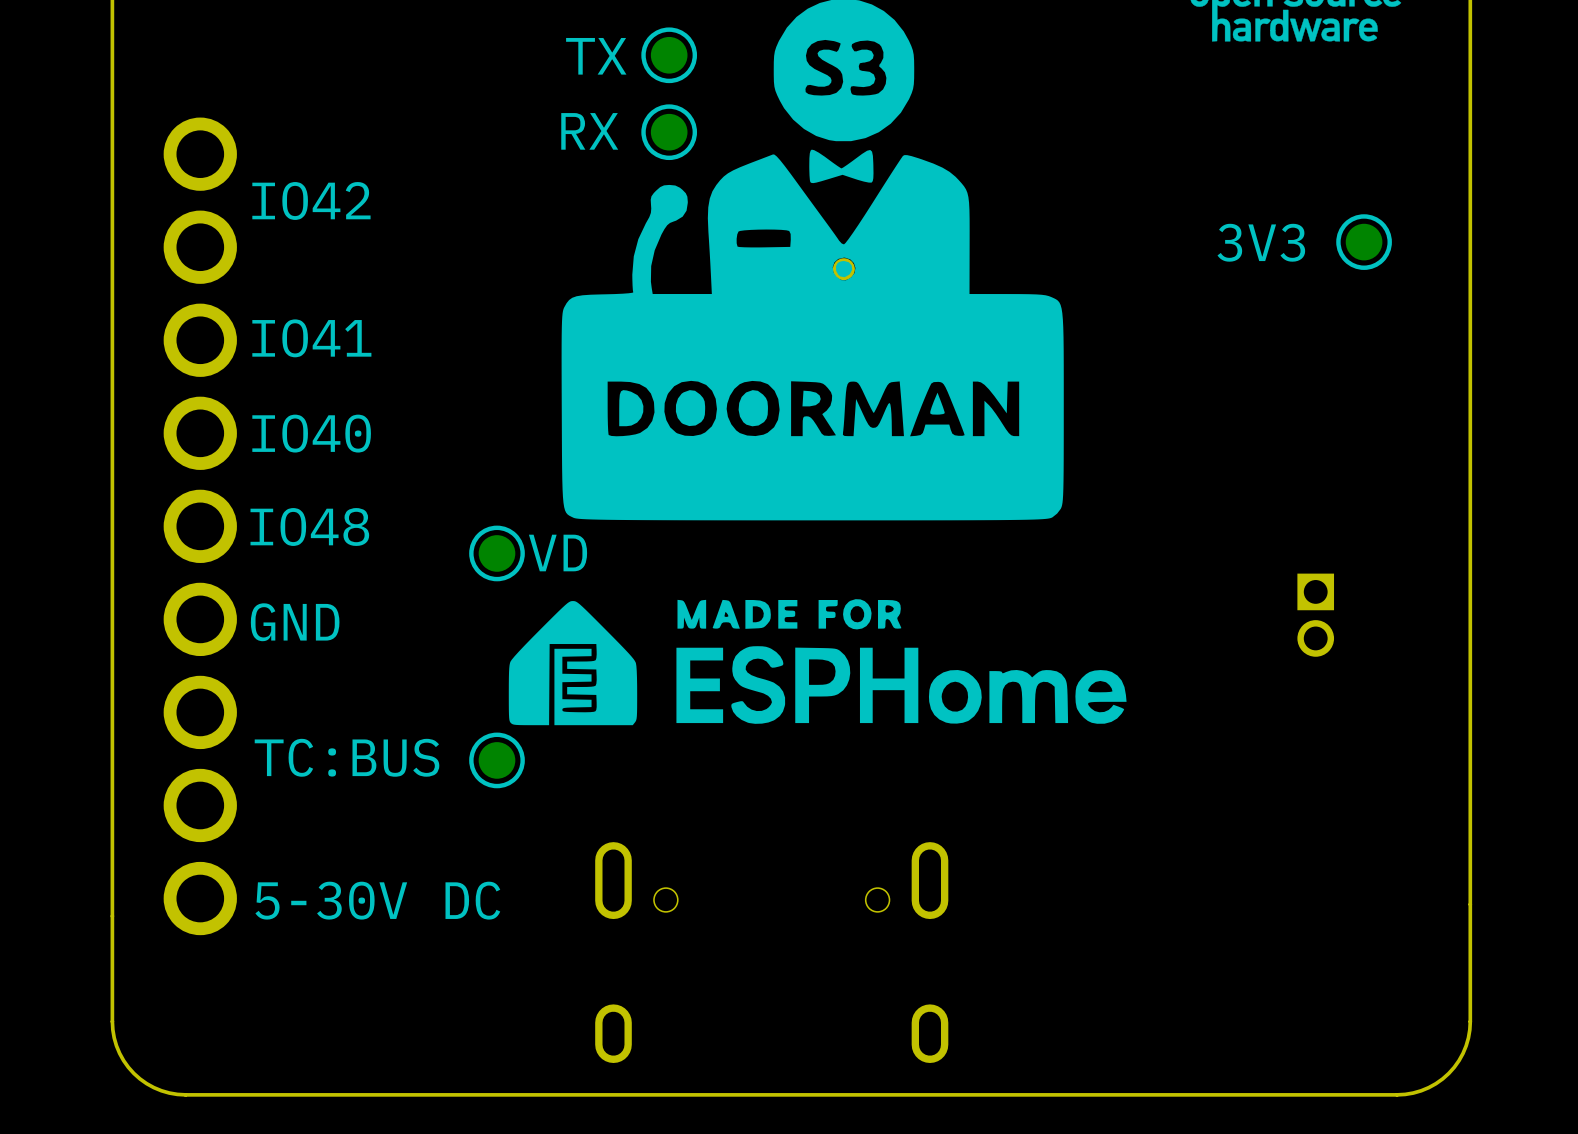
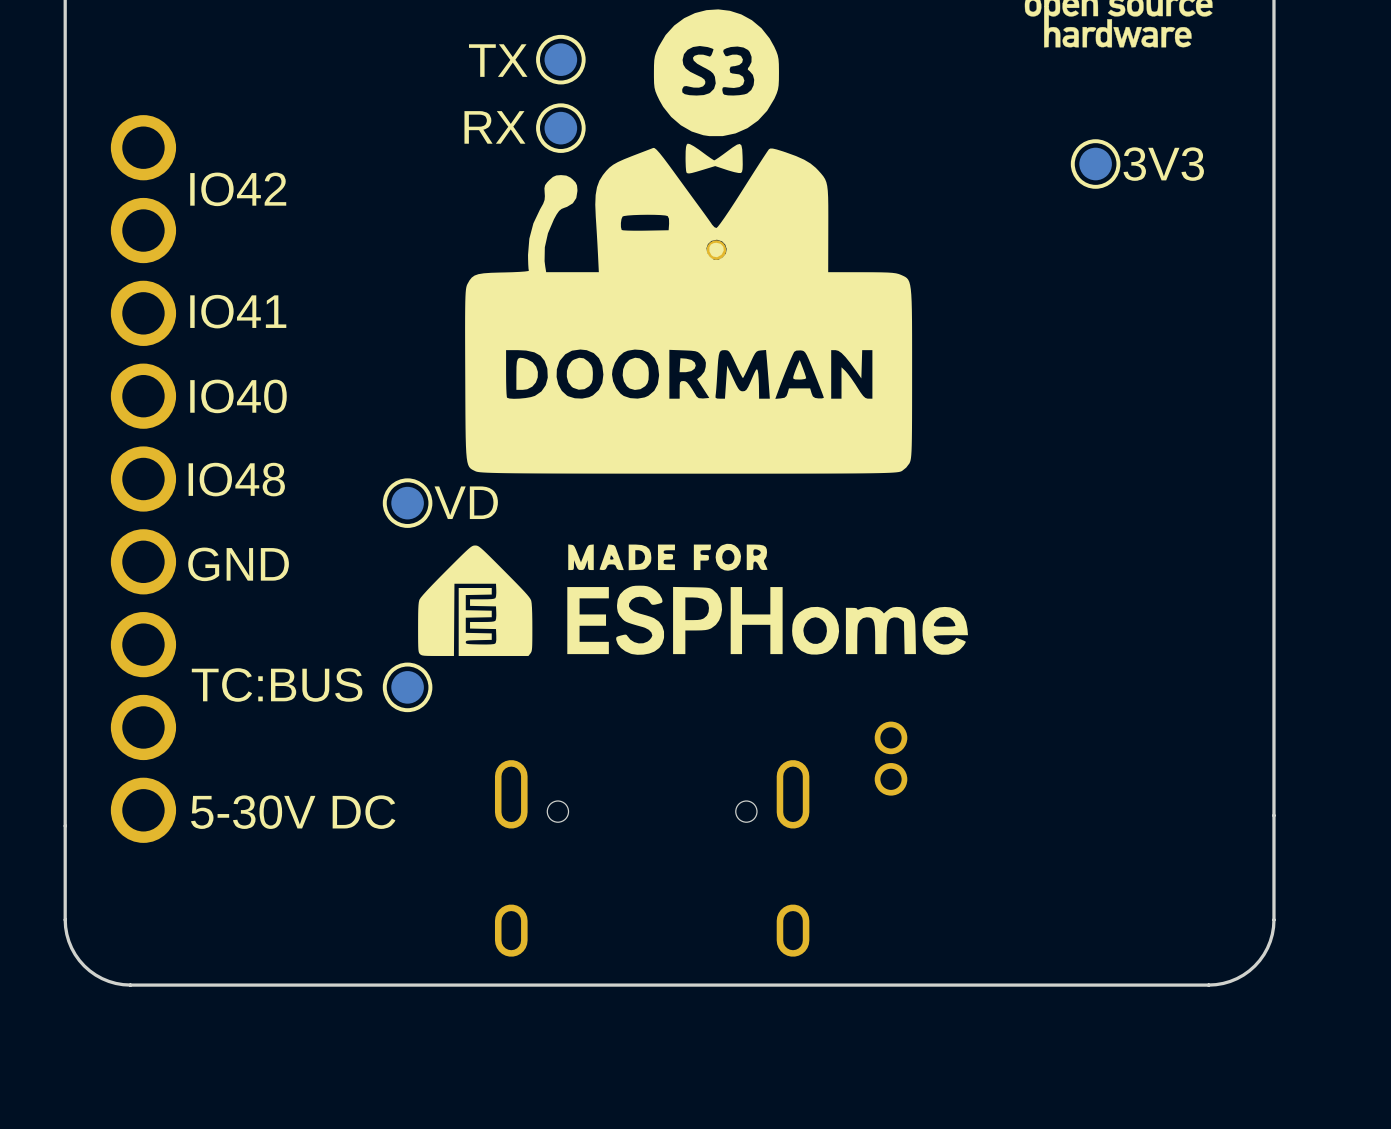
text position: 3V3 (1261, 242) -> 3V3 (1163, 164)
part position: (1364, 242) -> (1095, 164)
part: (1315, 615) -> none
part: none -> (891, 758)

